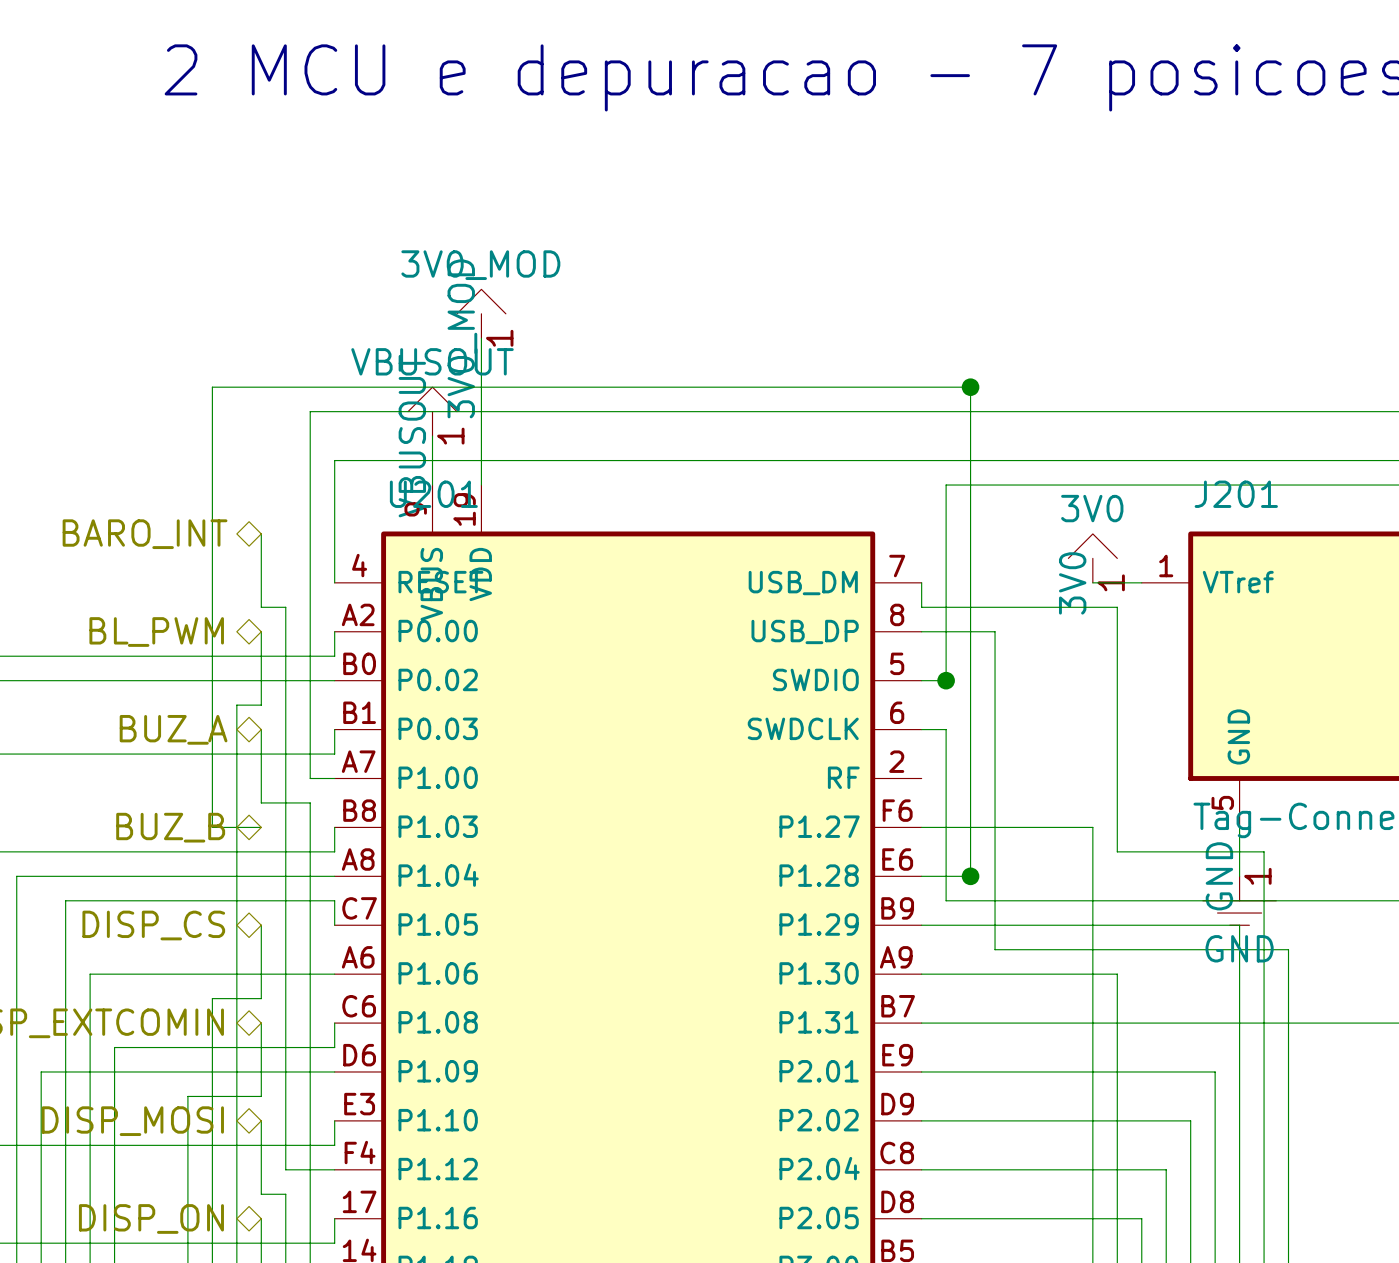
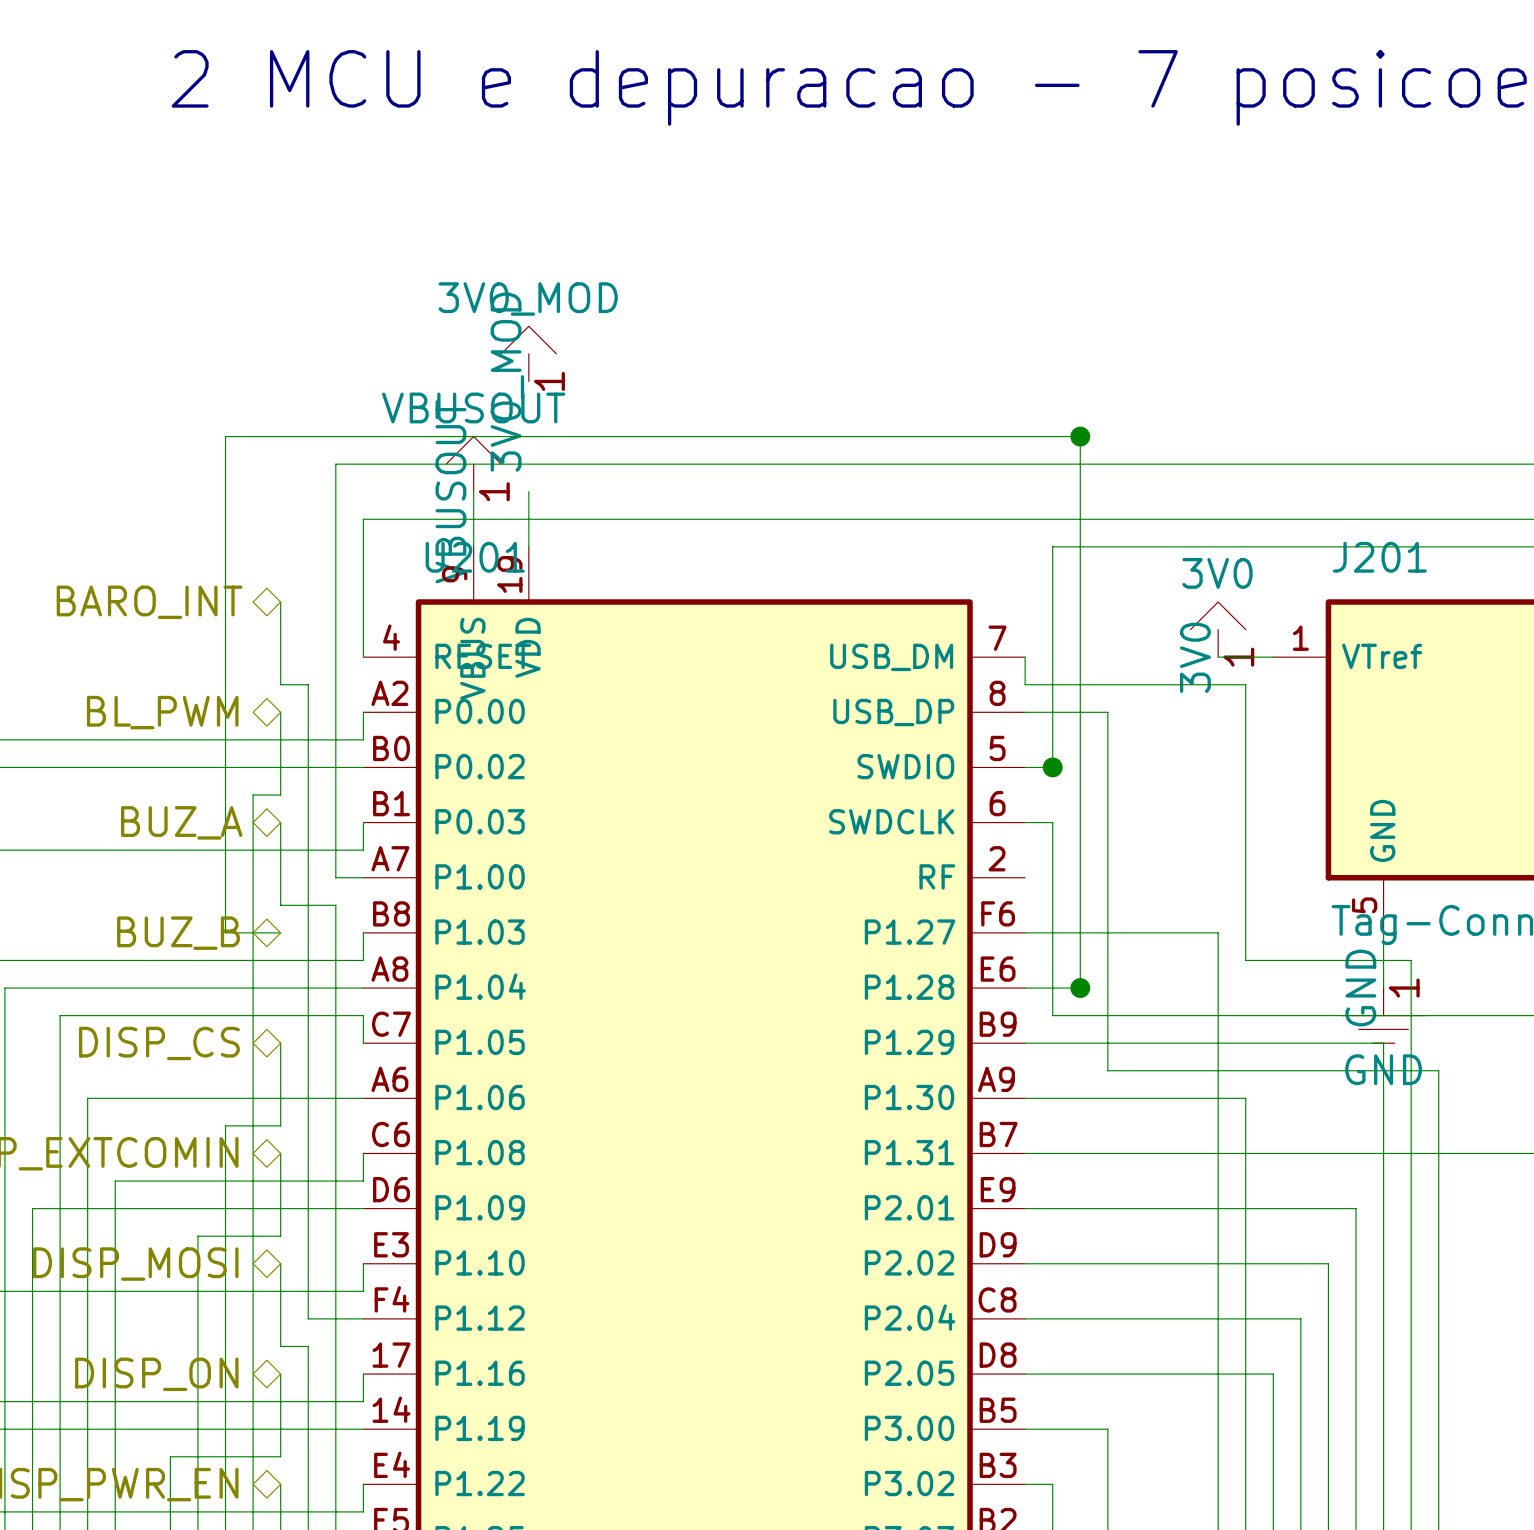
wire: (481, 338) (481, 436) -> none

